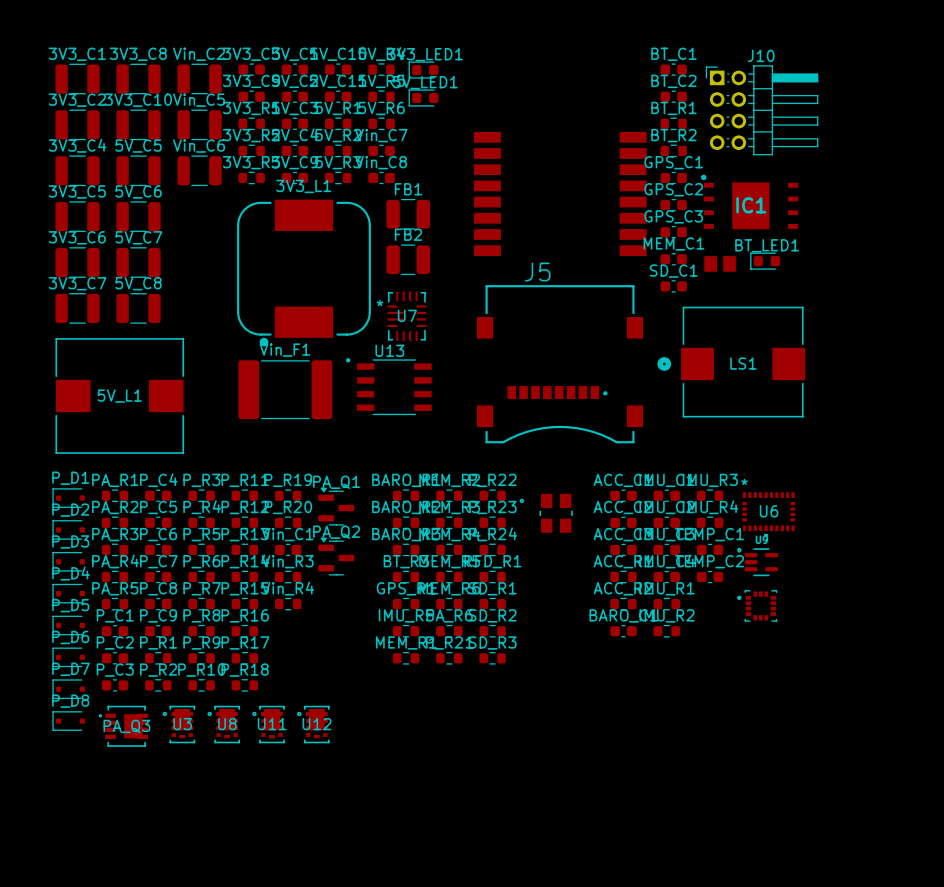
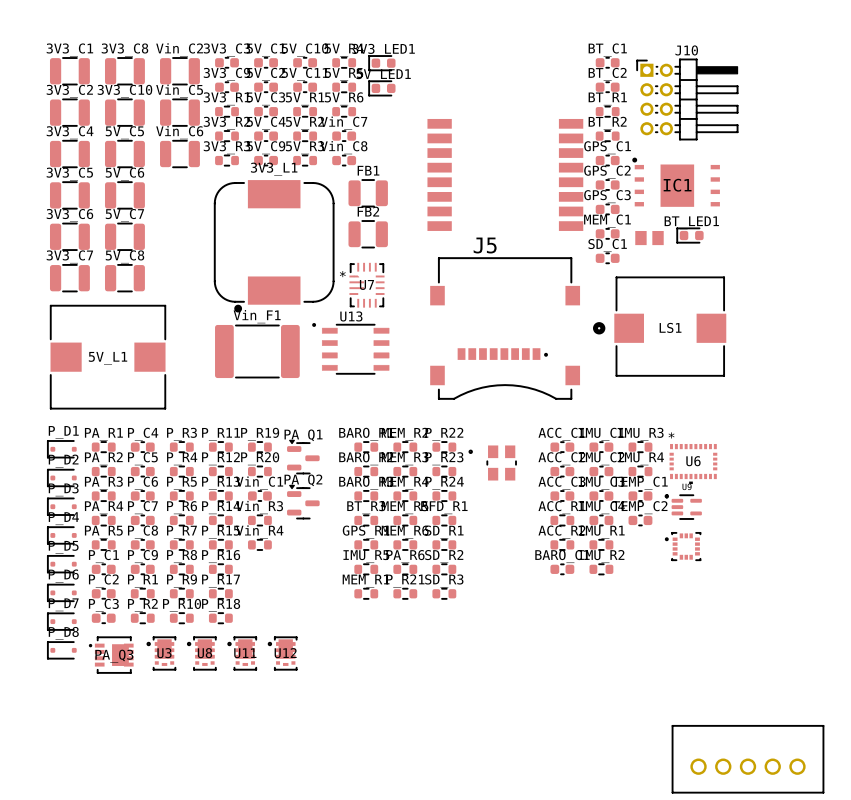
part: none -> (748, 759)

